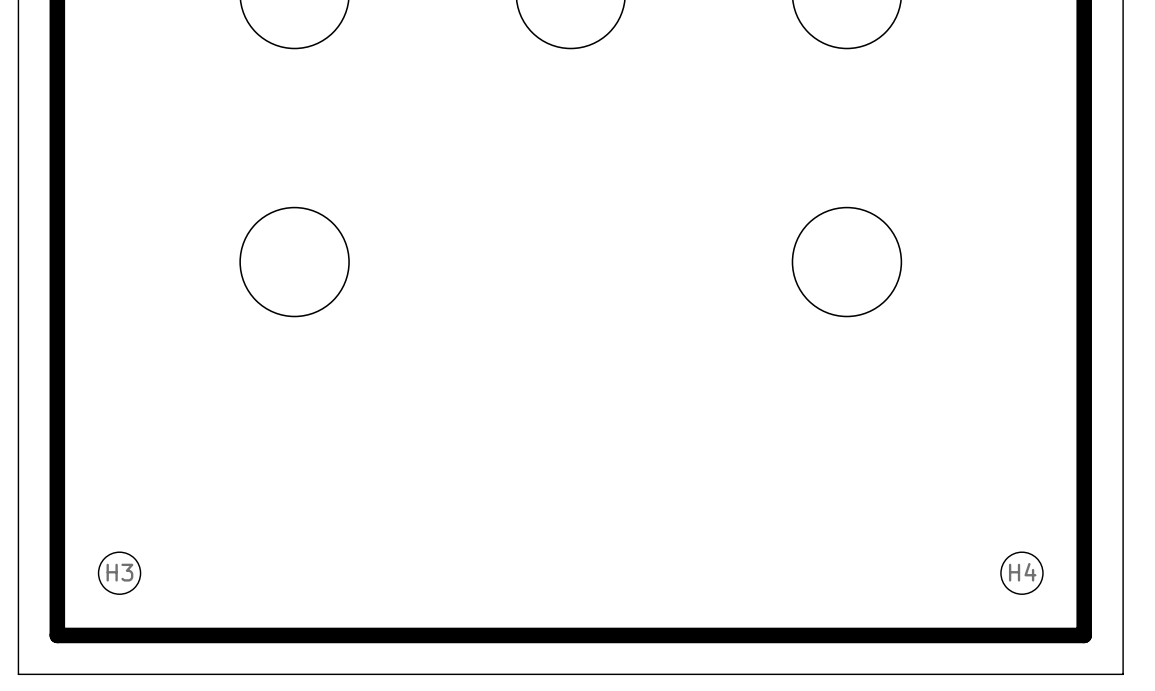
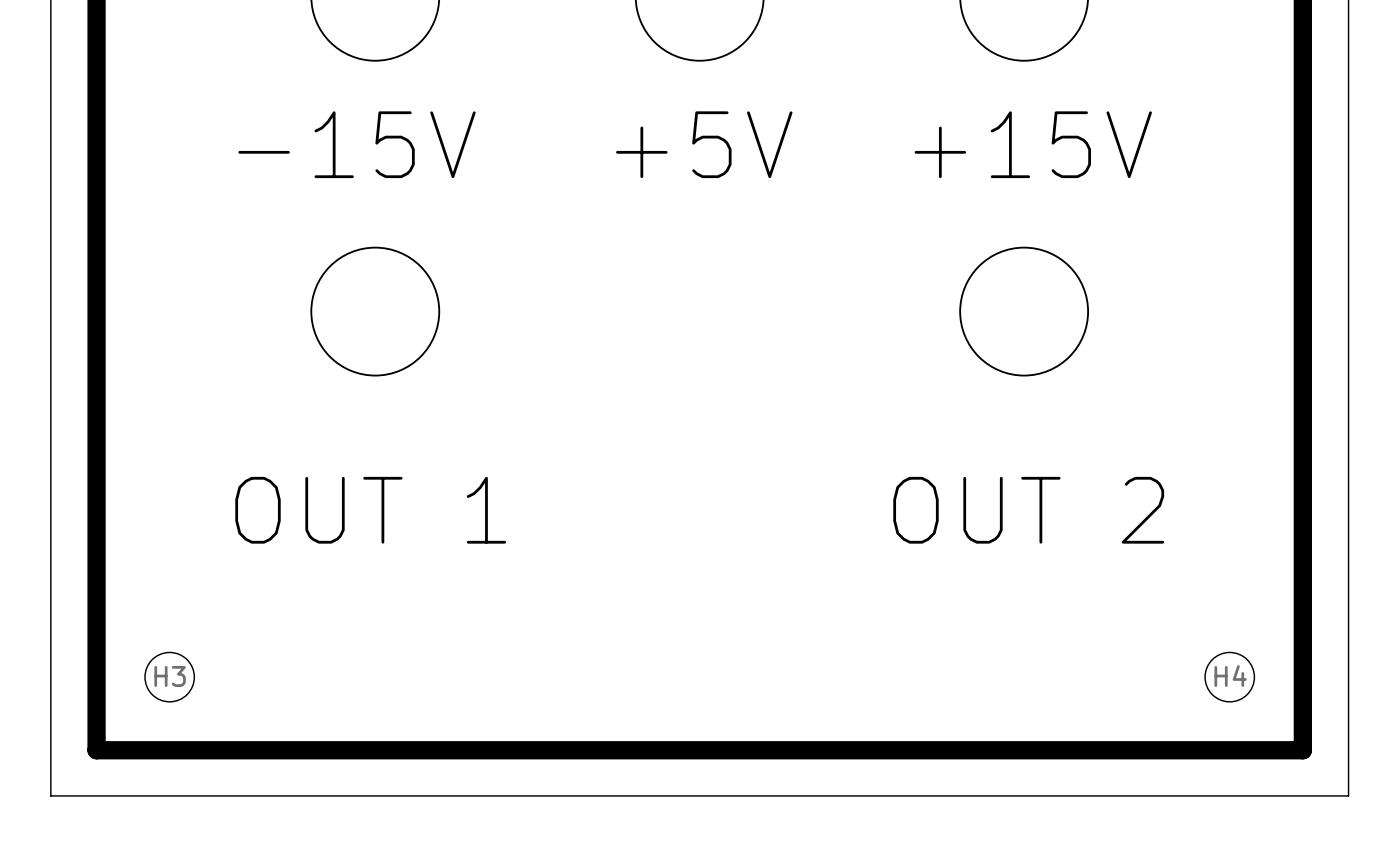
text: none -> -15V (357, 144)
text: none -> +5V (704, 144)
text: none -> +15V (1033, 144)
text: none -> OUT 1 (370, 510)
text: none -> OUT 2 (1028, 510)

